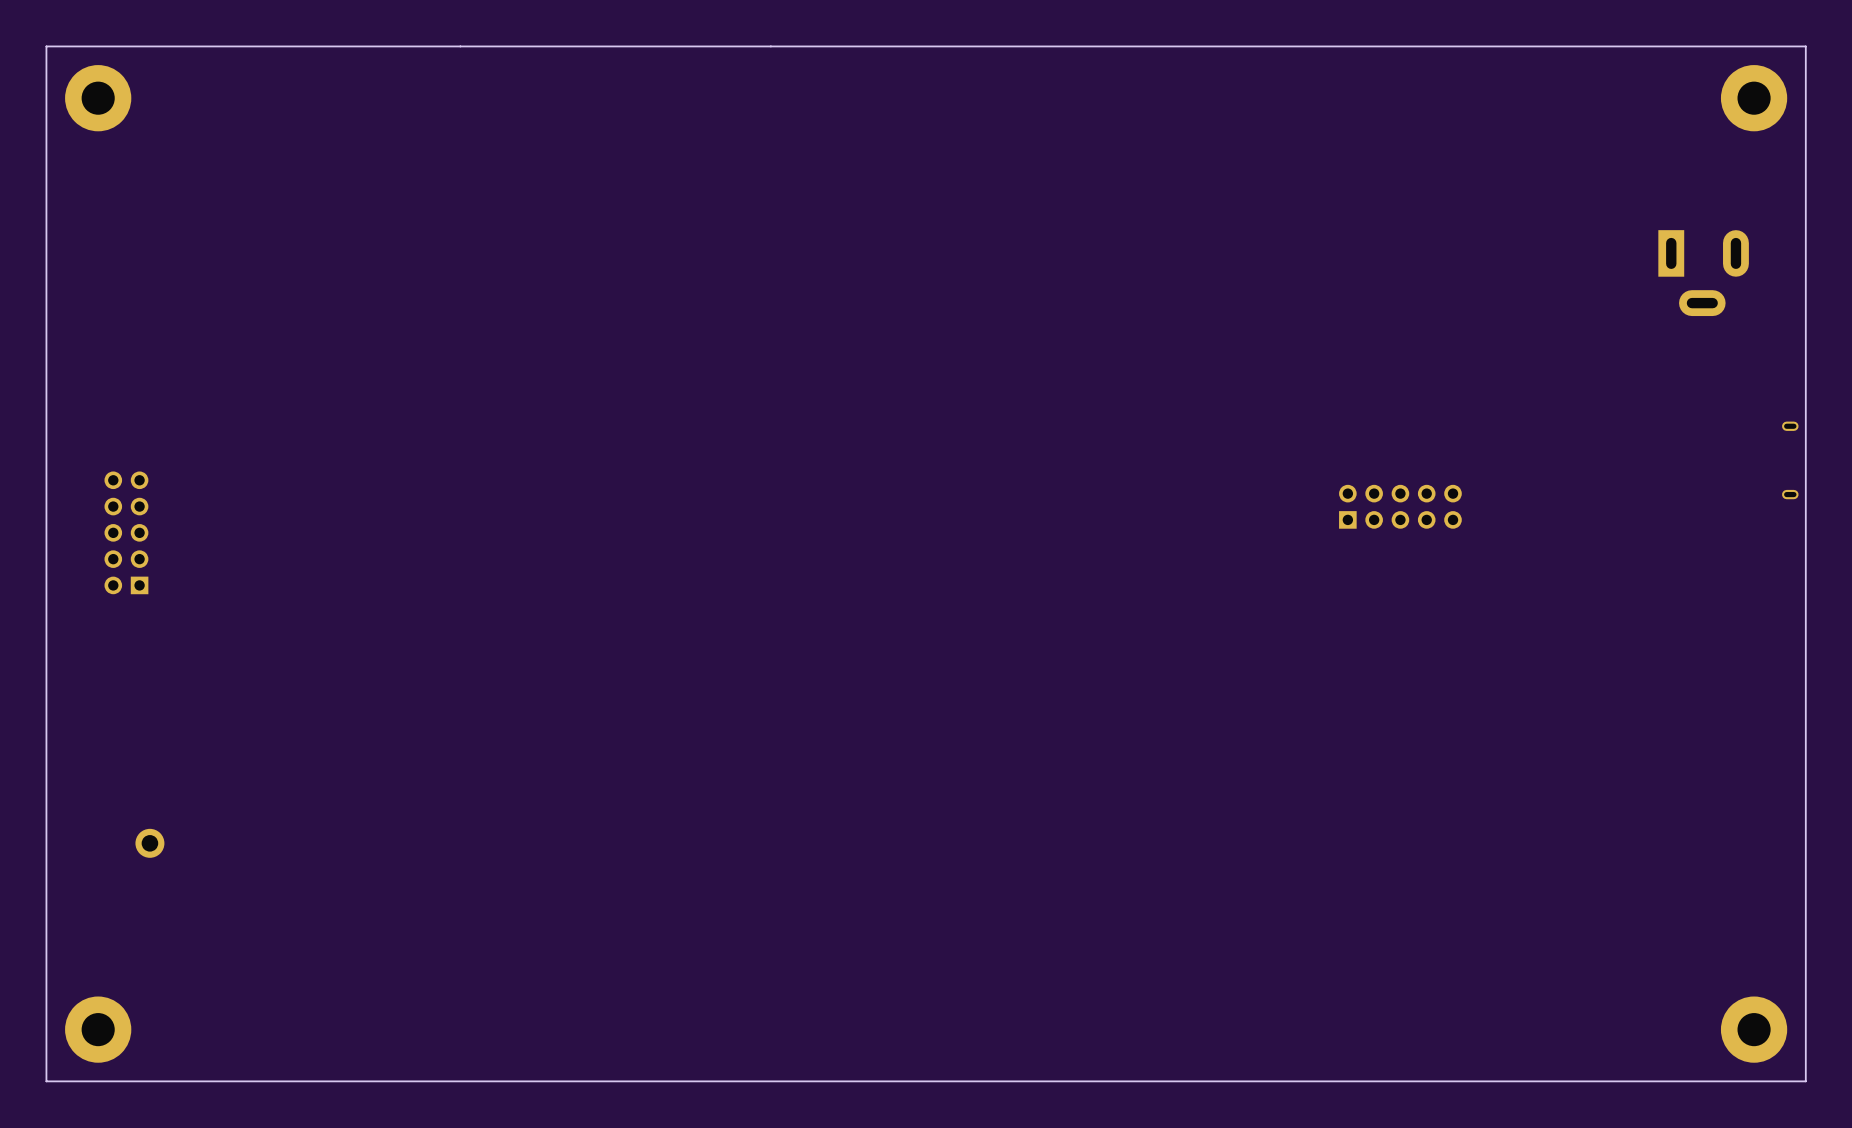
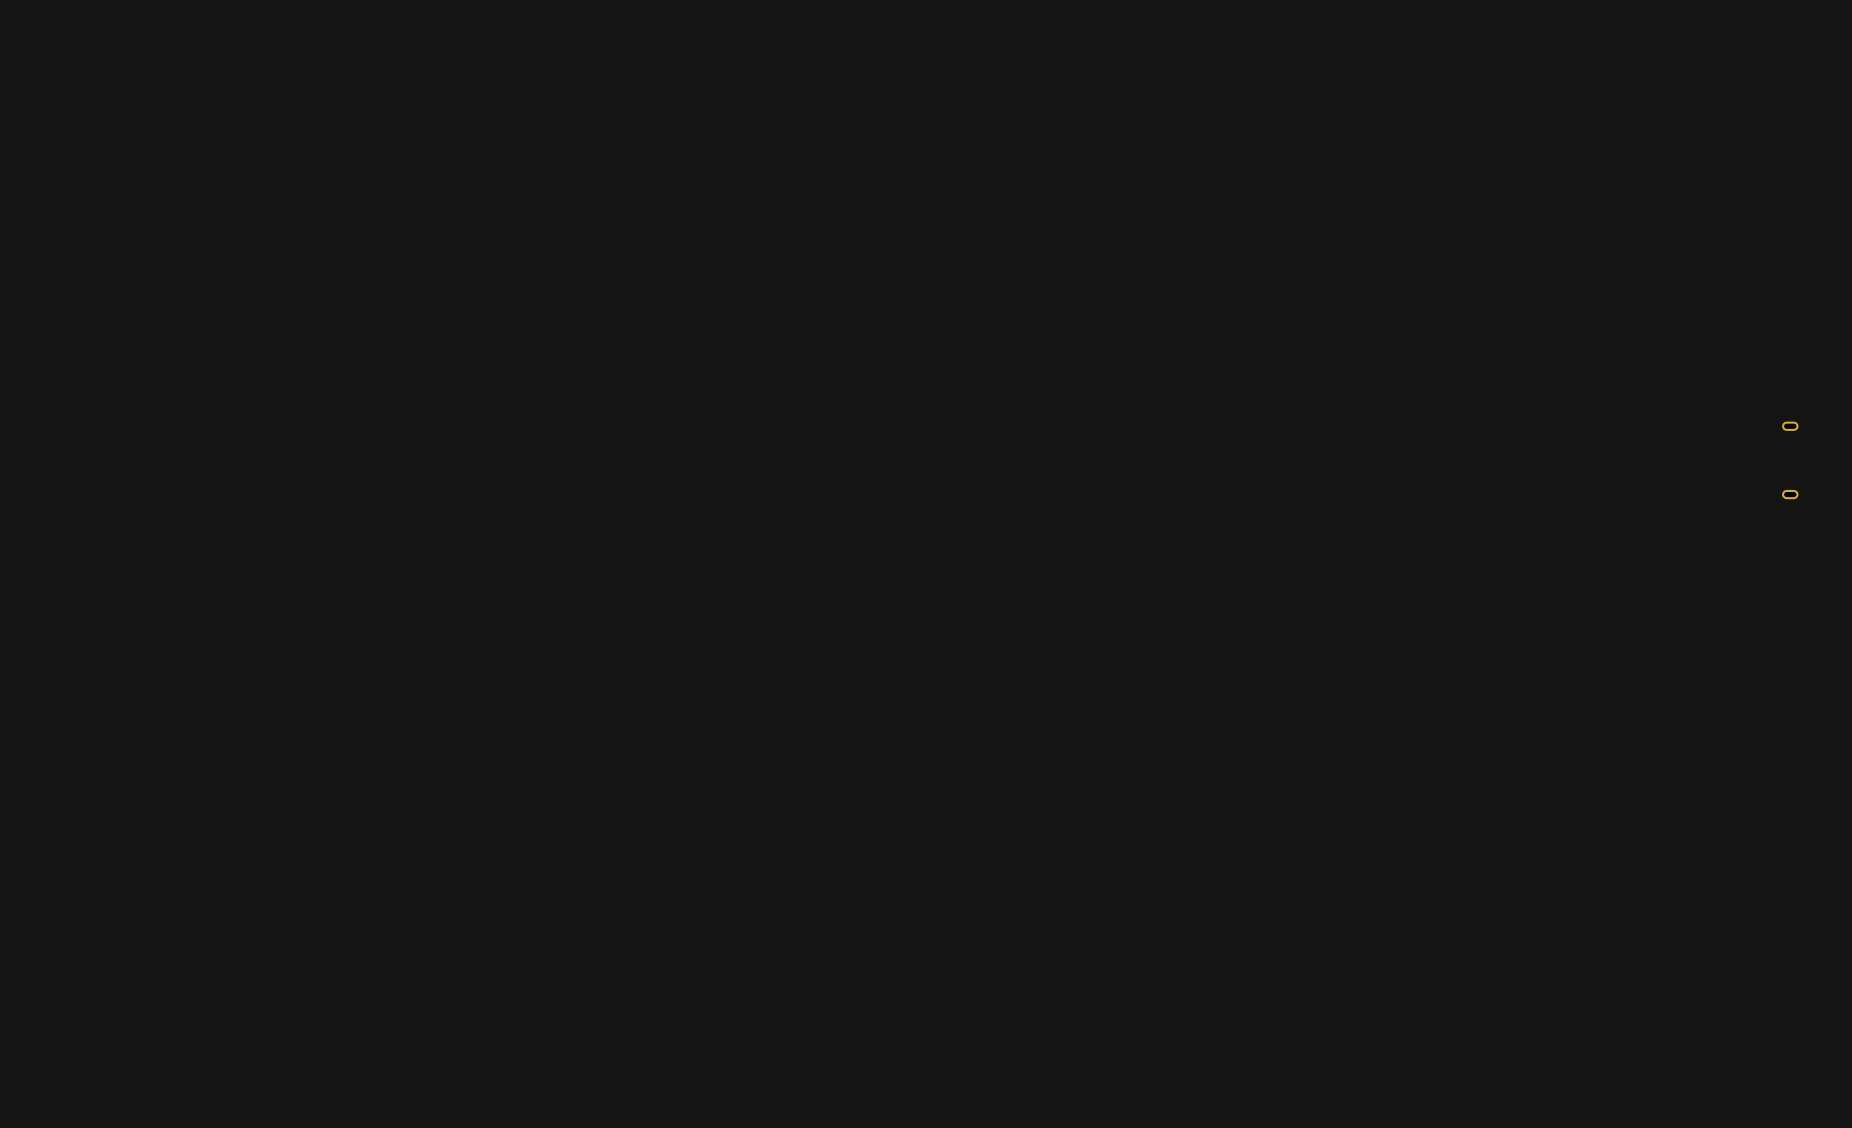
board edge: (1805, 46) (46, 46) (46, 1081) (1805, 1081) (1805, 46) -> none
part: (98, 98) -> none
part: (1754, 98) -> none
part: (1703, 273) -> none
part: (1400, 506) -> none
part: (126, 532) -> none
part: (149, 843) -> none
part: (98, 1029) -> none
part: (1754, 1029) -> none

